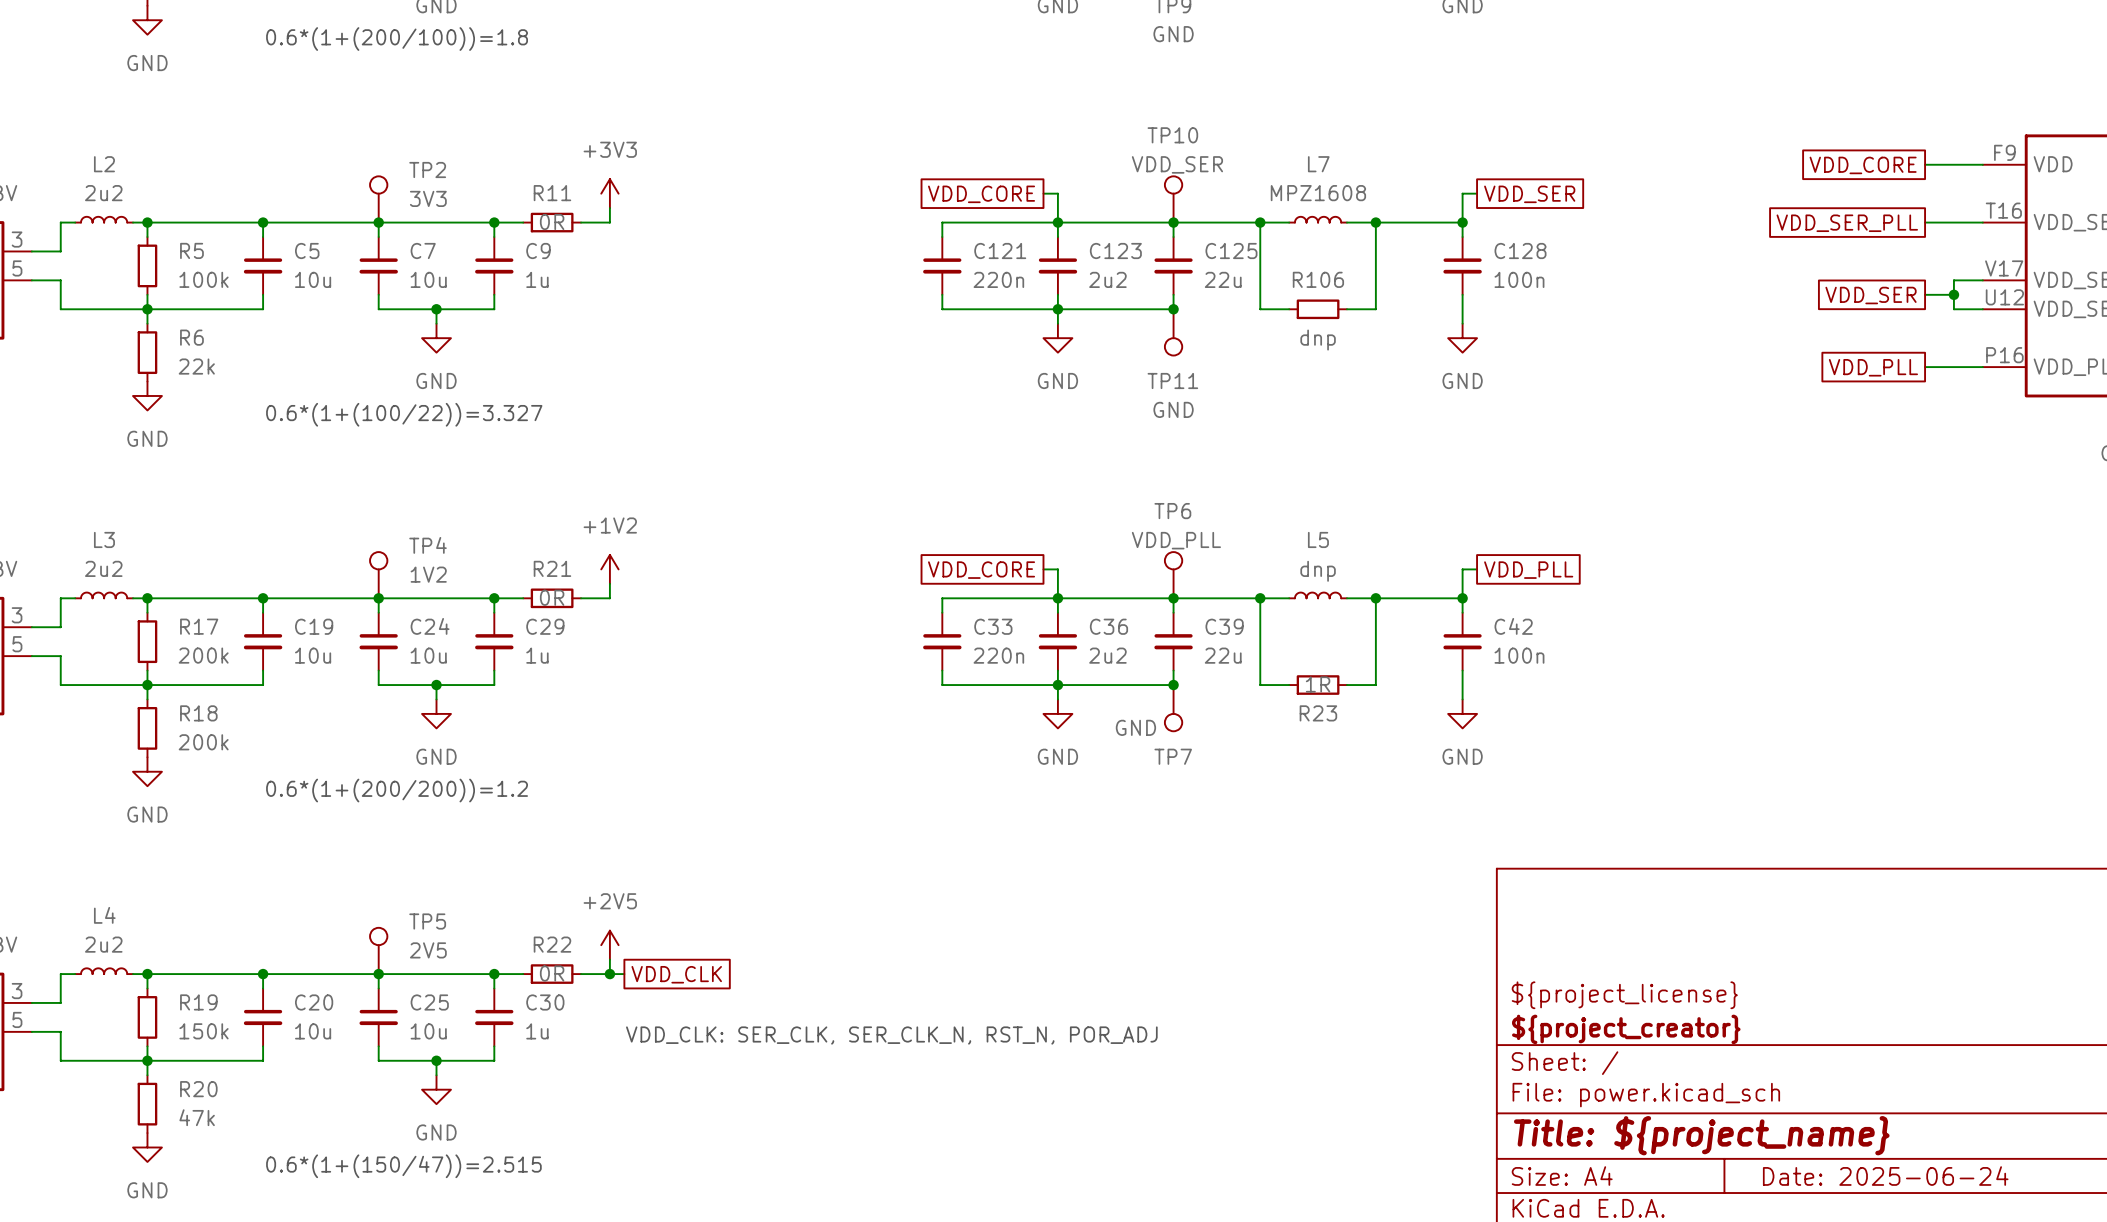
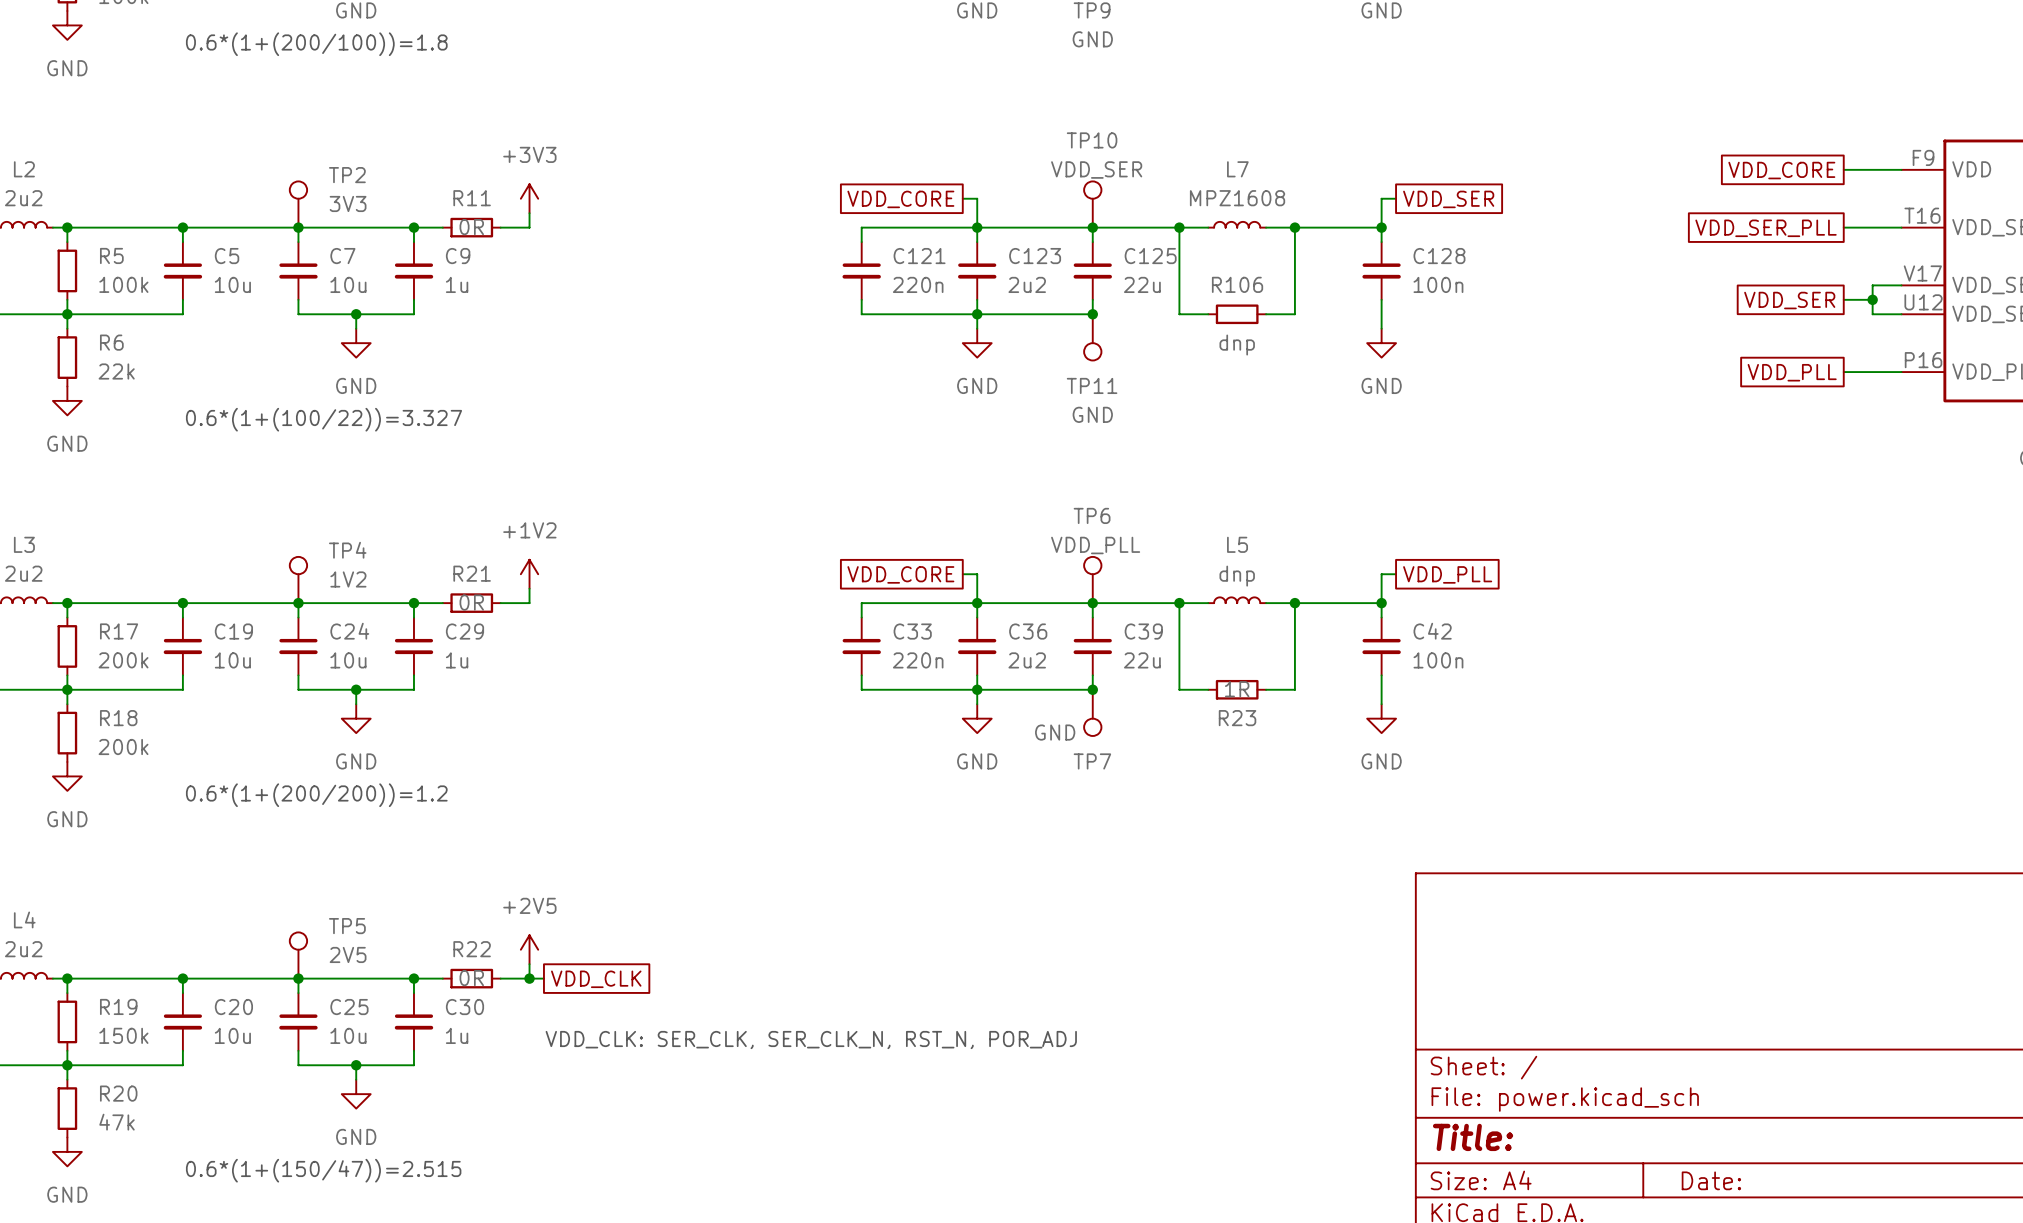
title block: ${project_license} (1624, 995) -> none
title block: ${project_creator} (1626, 1029) -> none
title block: Title: ${project_name} (1701, 1135) -> Title: (1473, 1137)
title block: Date: 2025-06-24 (1885, 1176) -> Date: (1711, 1180)

